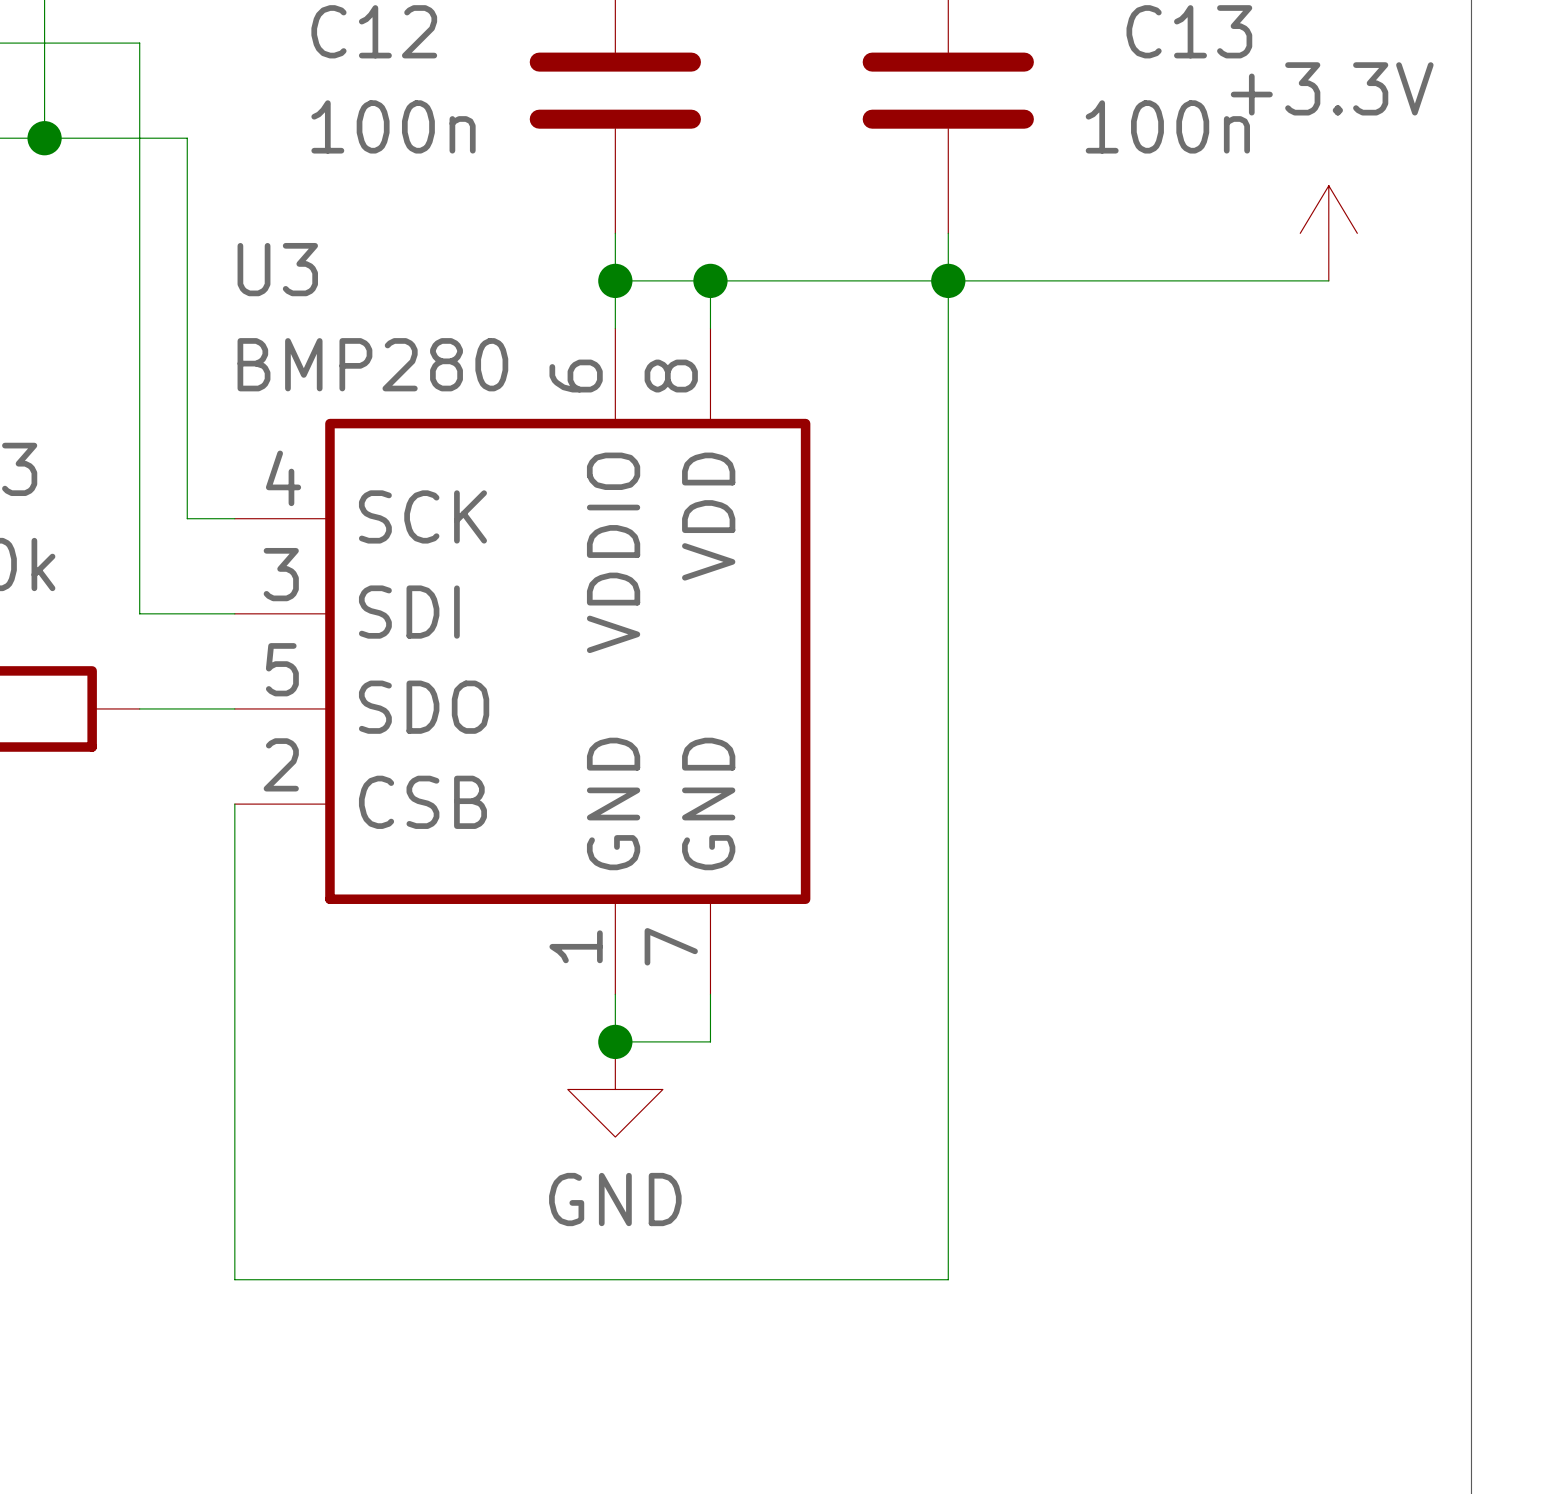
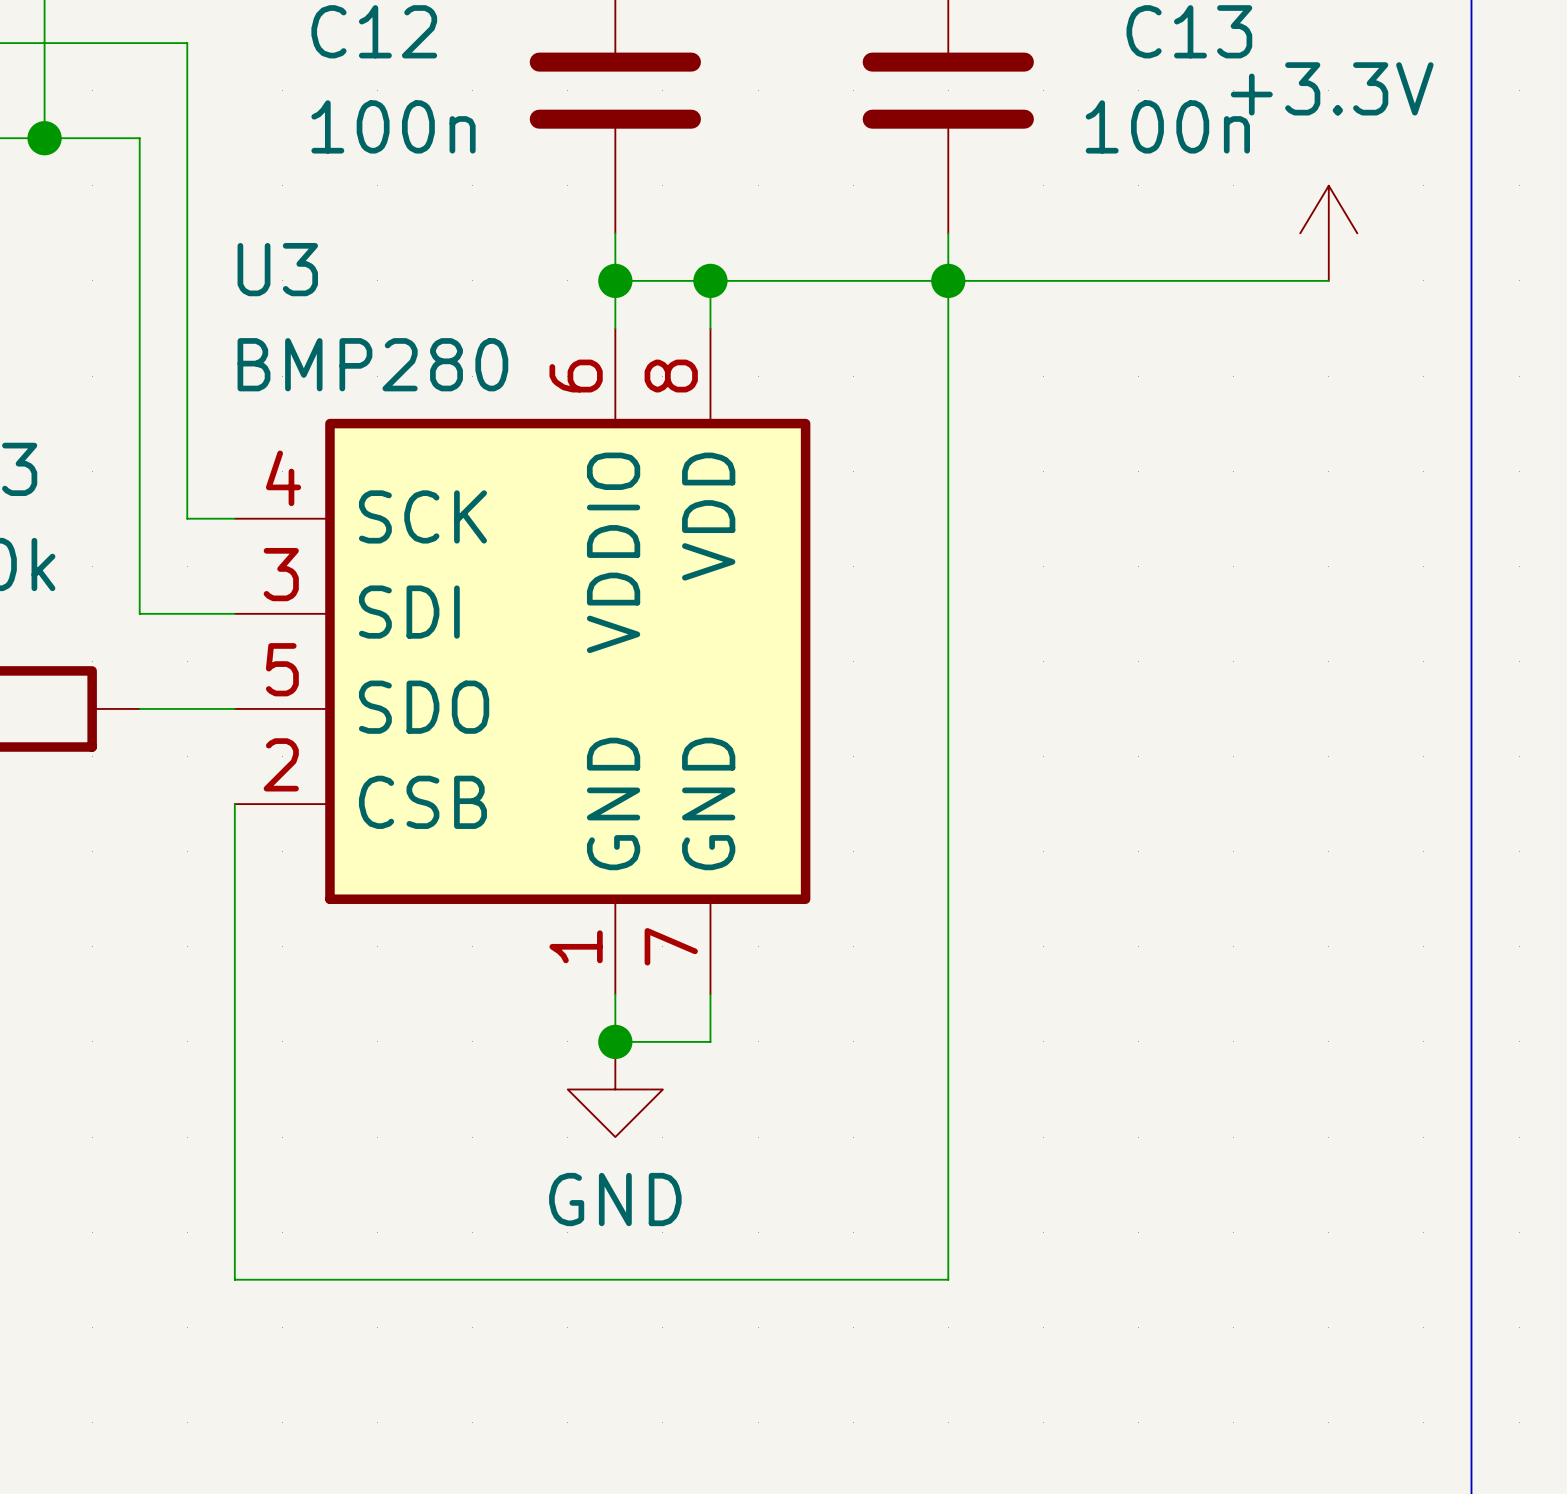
wire: (139, 43) (139, 138) (187, 138) -> (139, 43) (187, 43) (187, 138)

